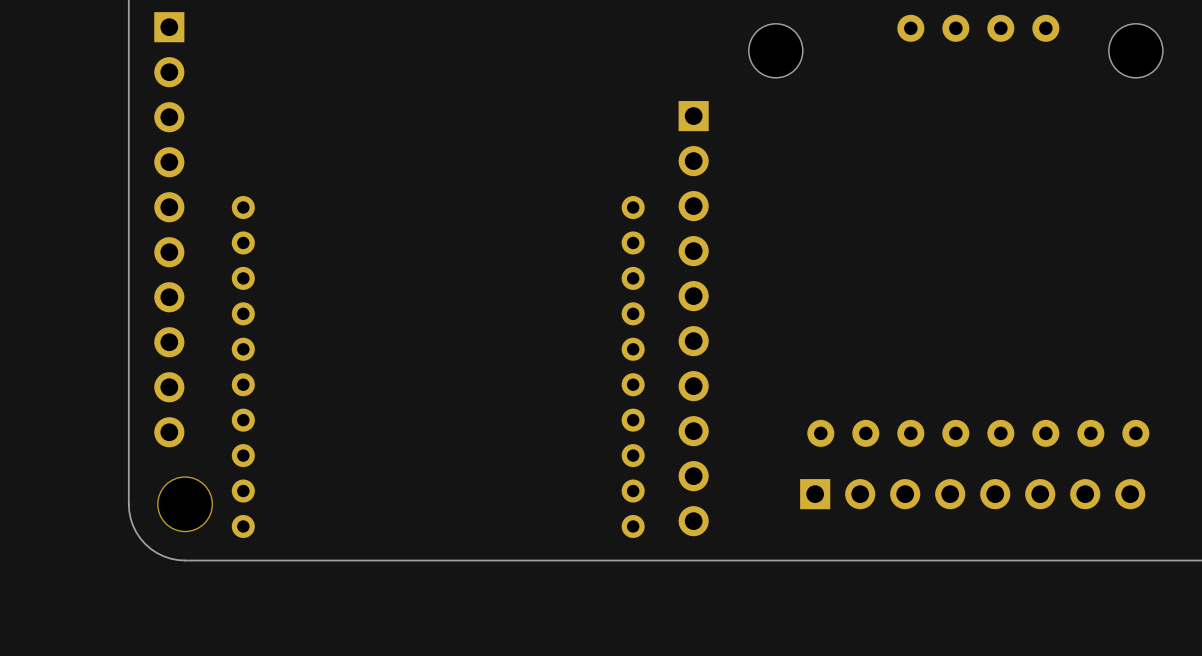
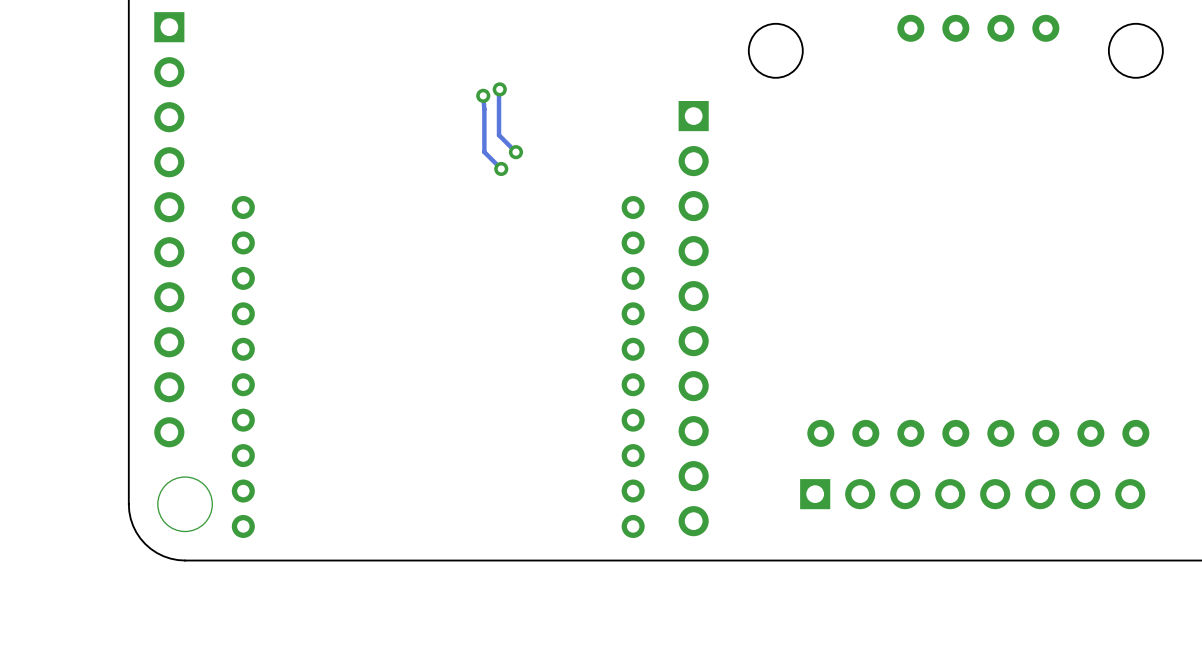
track: none -> (499, 89) (499, 135) (515, 152)
via: none -> (499, 89)
track: none -> (483, 95) (484, 152) (501, 168)
via: none -> (483, 95)
via: none -> (515, 152)
via: none -> (501, 168)

